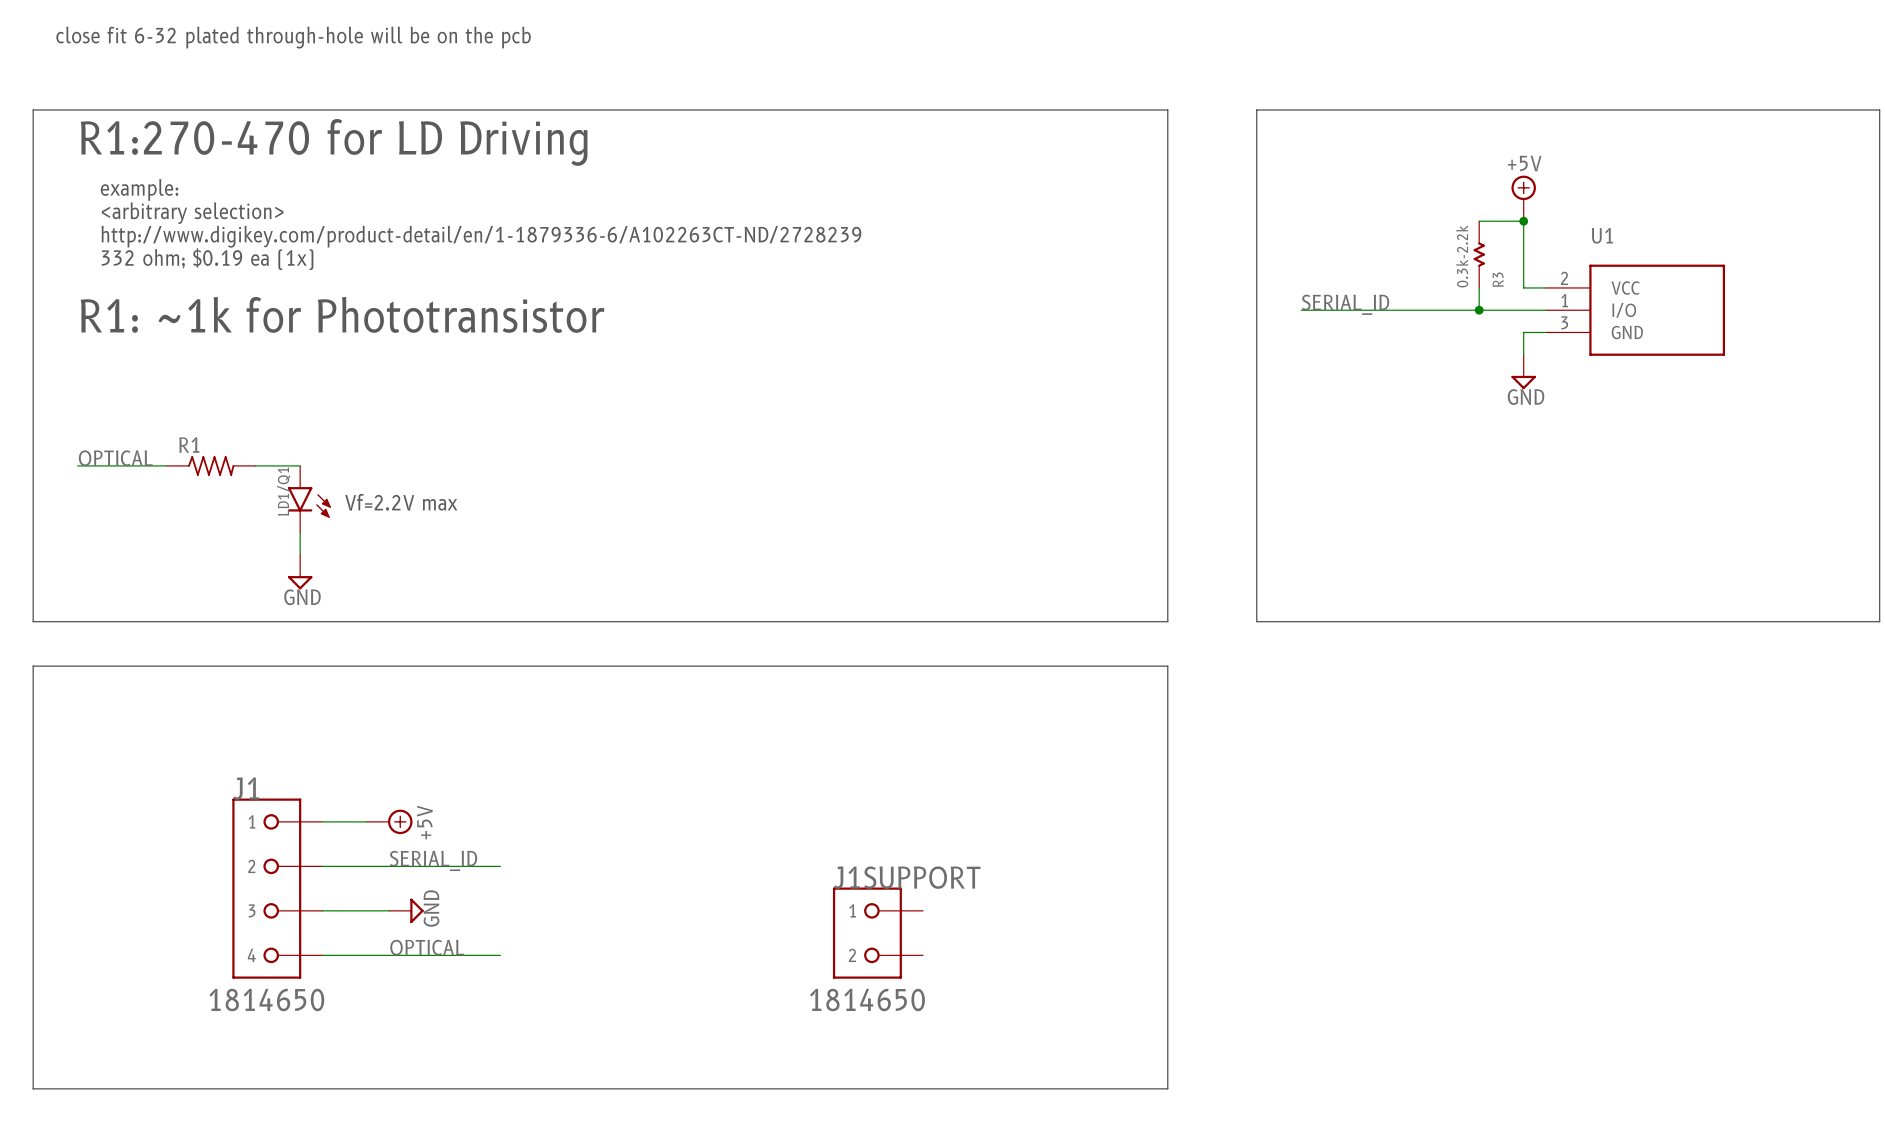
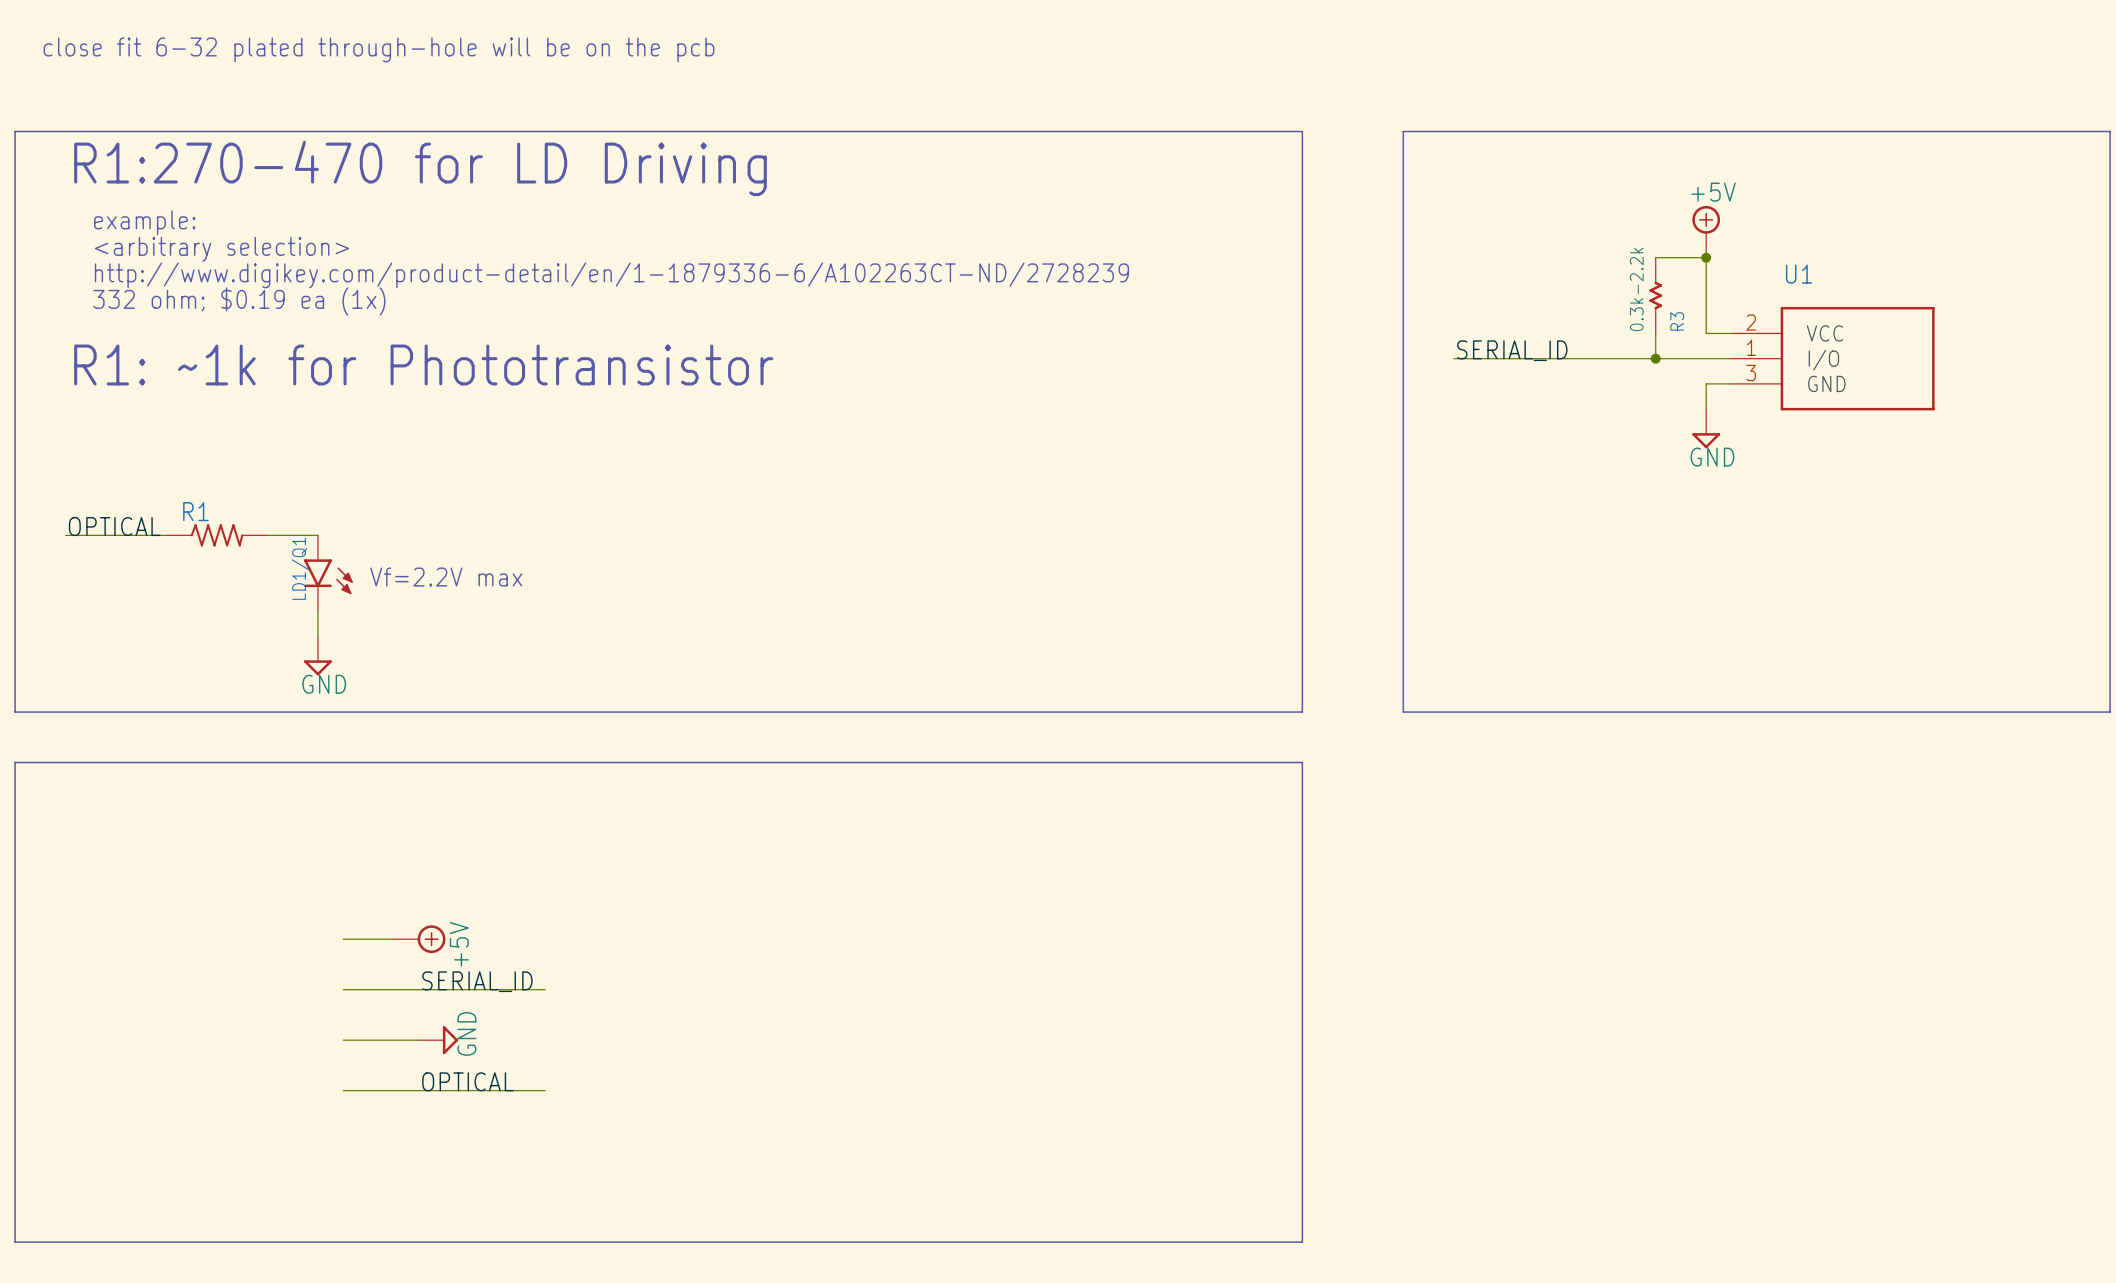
J1: 1814650 (277, 888) -> none
J1SUPPORT: 1814650 (878, 933) -> none

